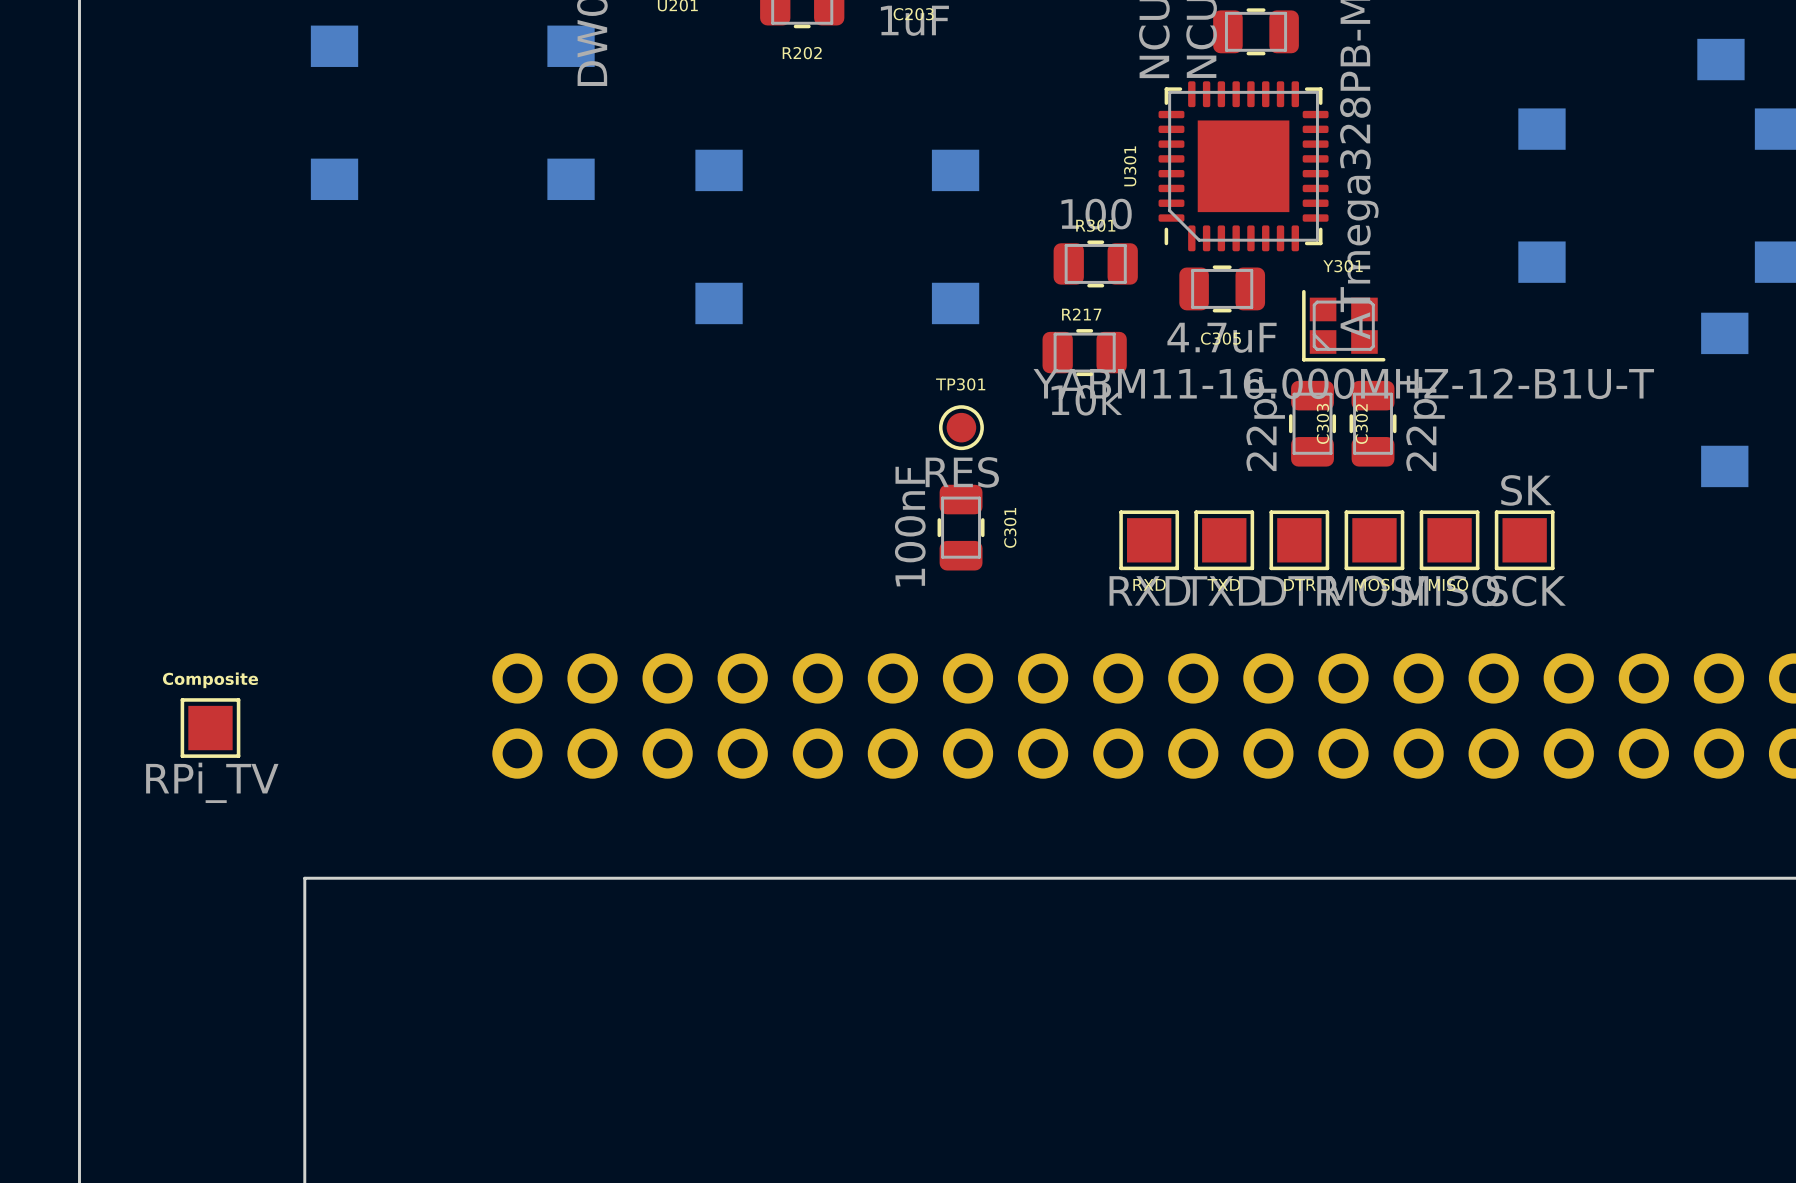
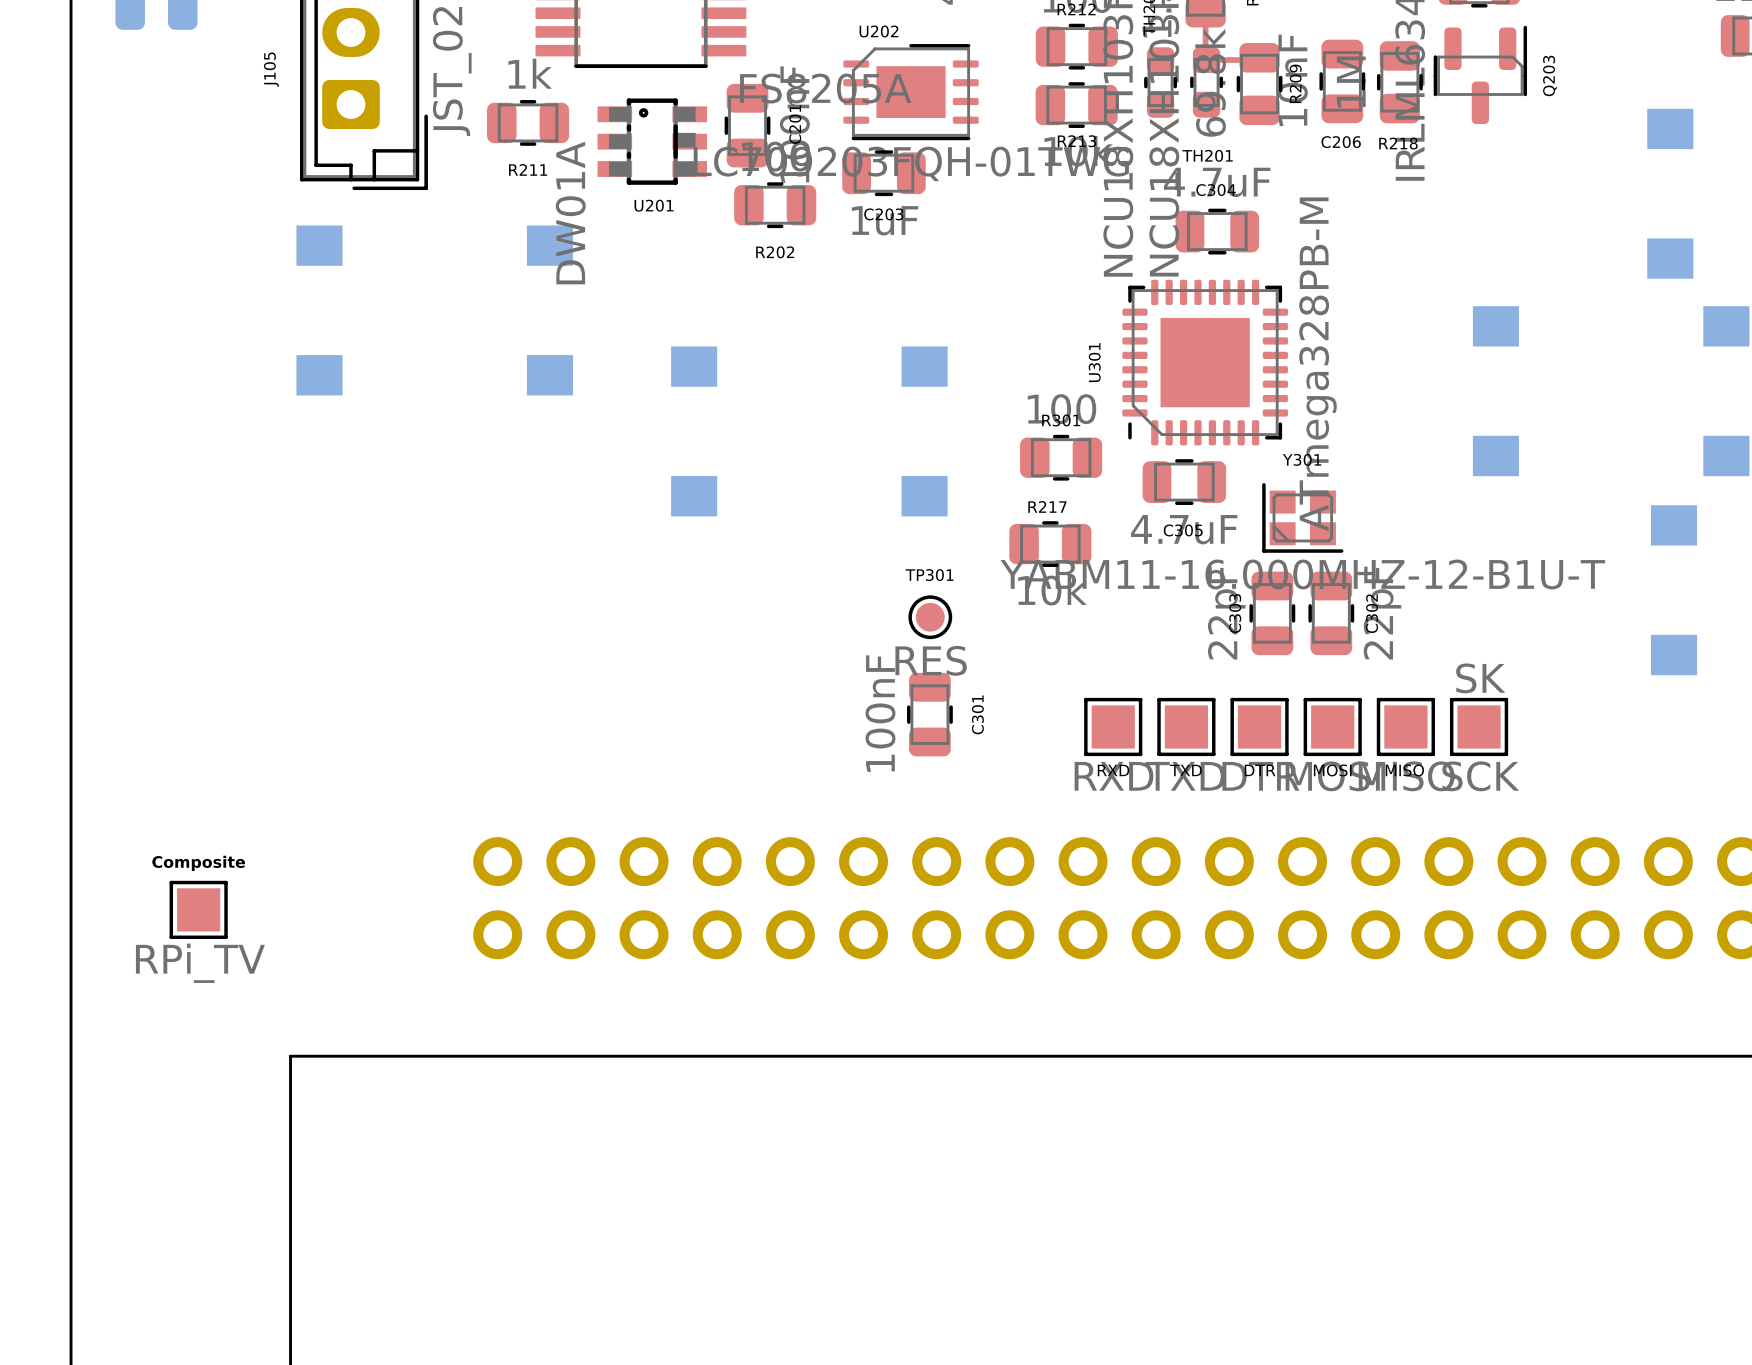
C303 name position: C303 (1322, 423) -> C303 (1235, 613)
C302 name position: C302 (1361, 424) -> C302 (1372, 613)

